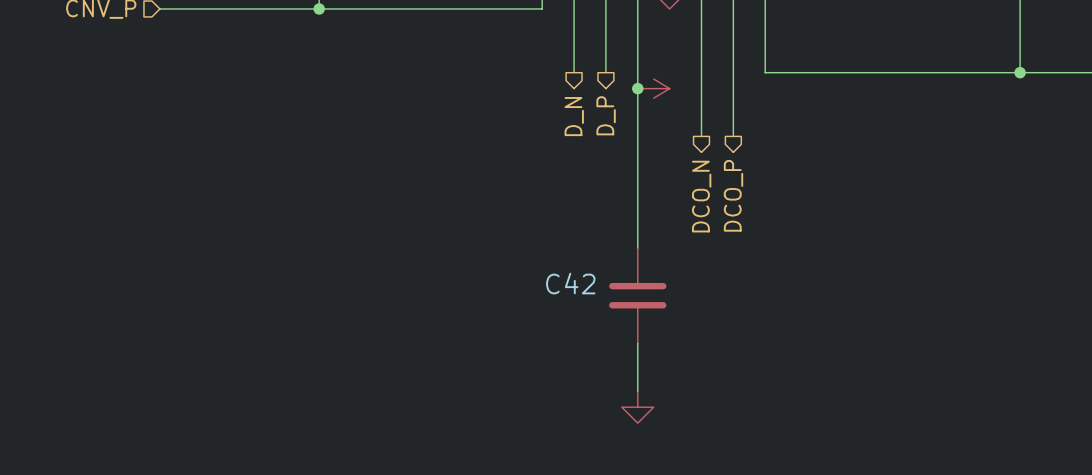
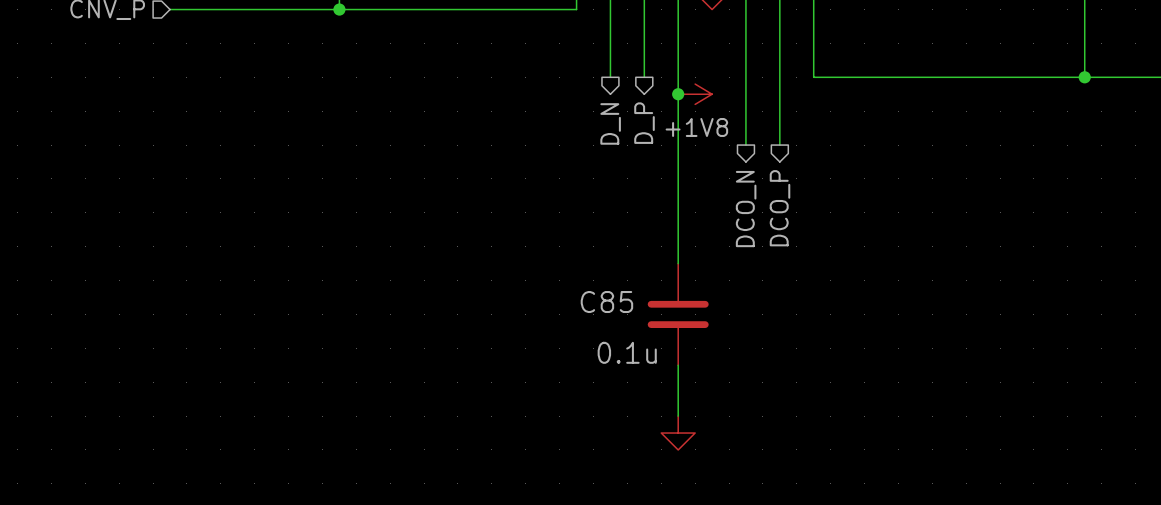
power symbol text: none -> +1V8 (696, 127)
C42 name: C42 (570, 283) -> C85 (606, 302)
C42 value: none -> 0.1u (627, 352)

